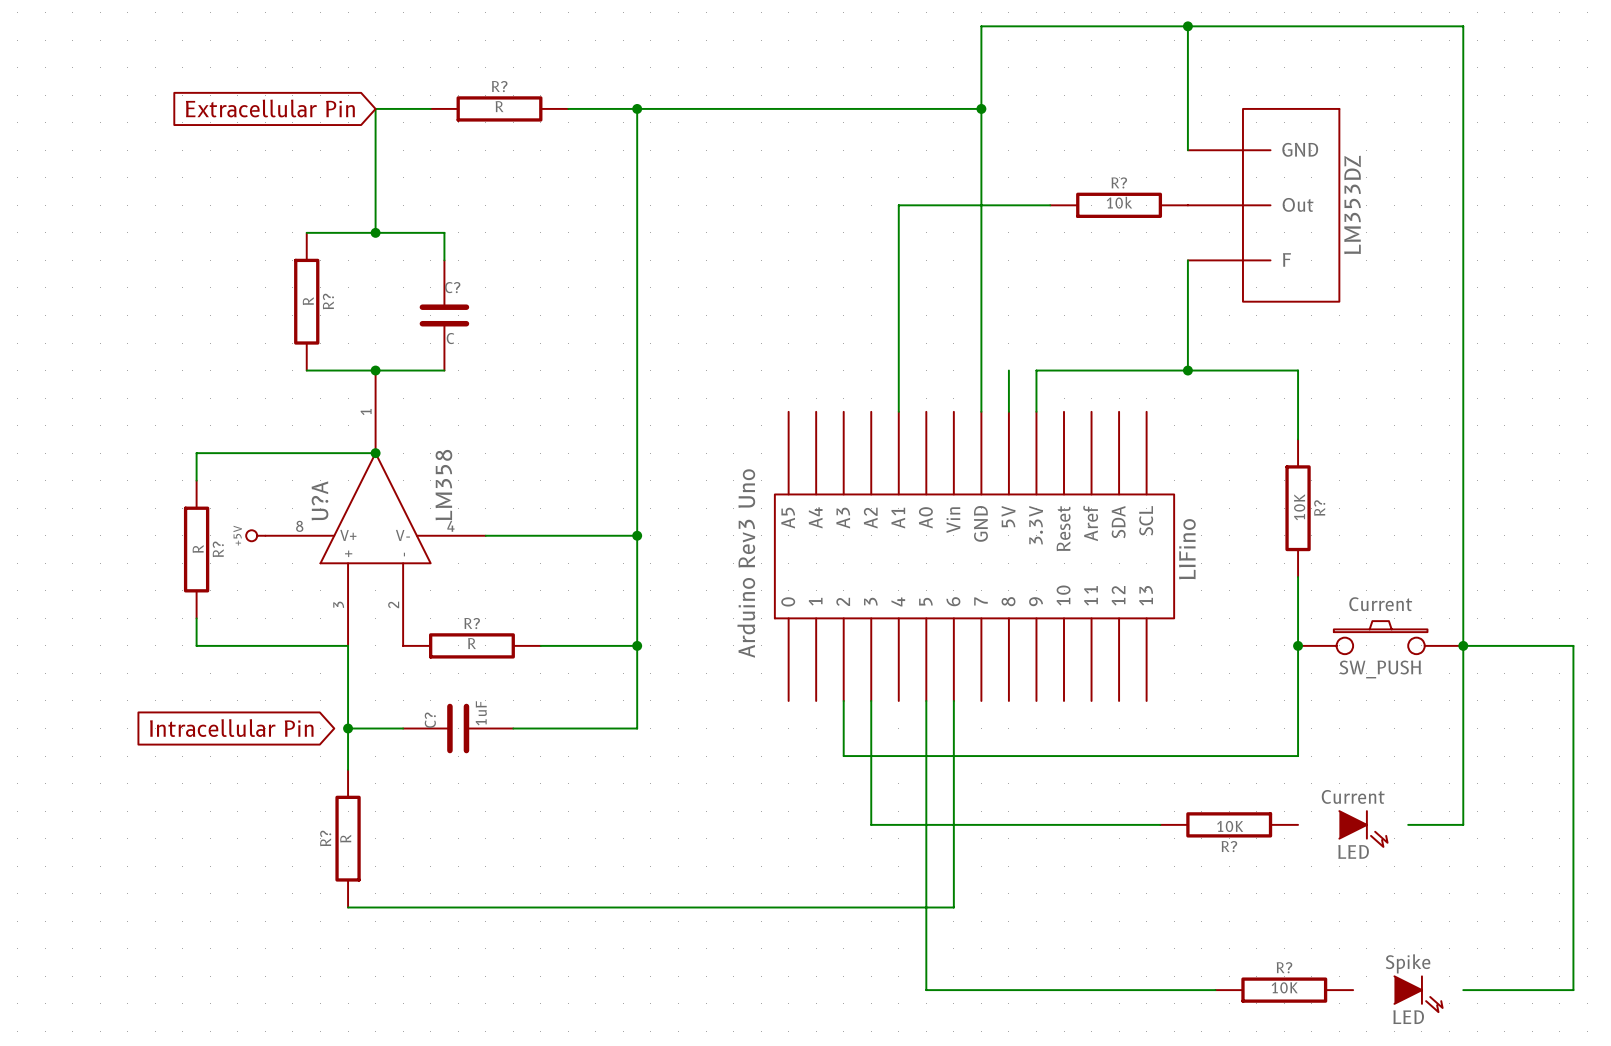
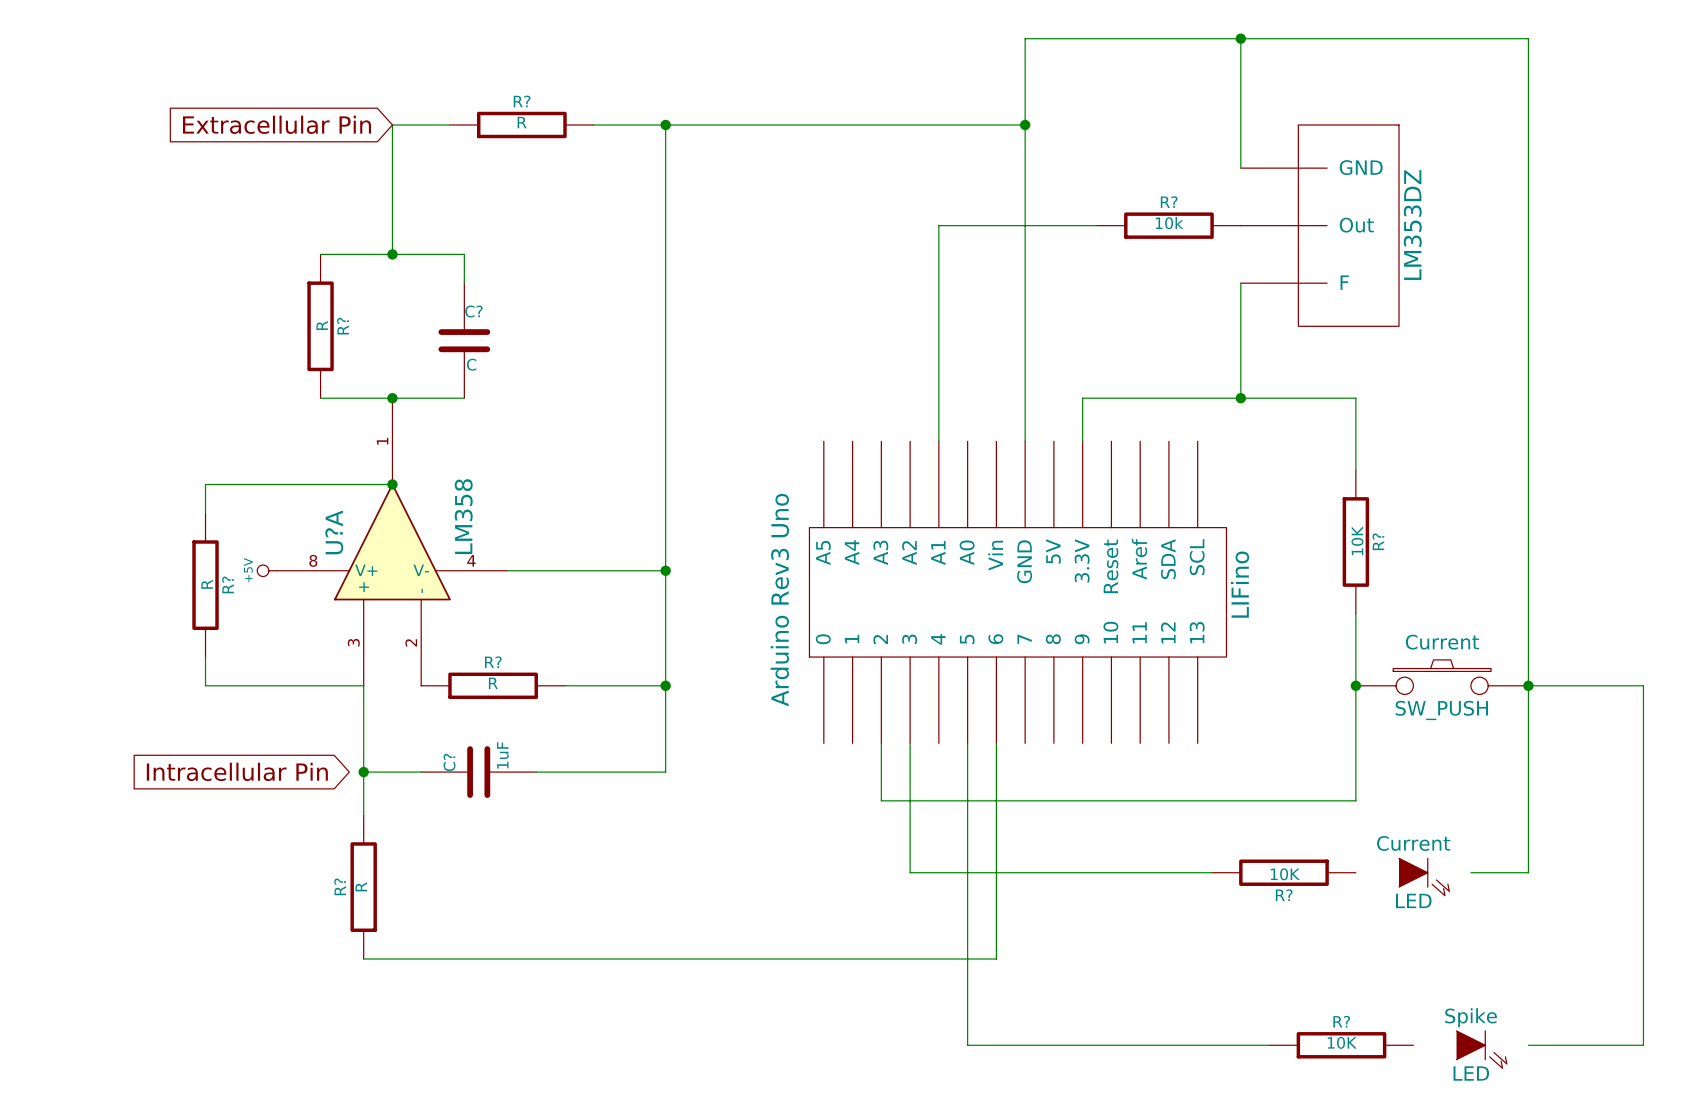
wire: (1008, 370) (1008, 411) -> none

